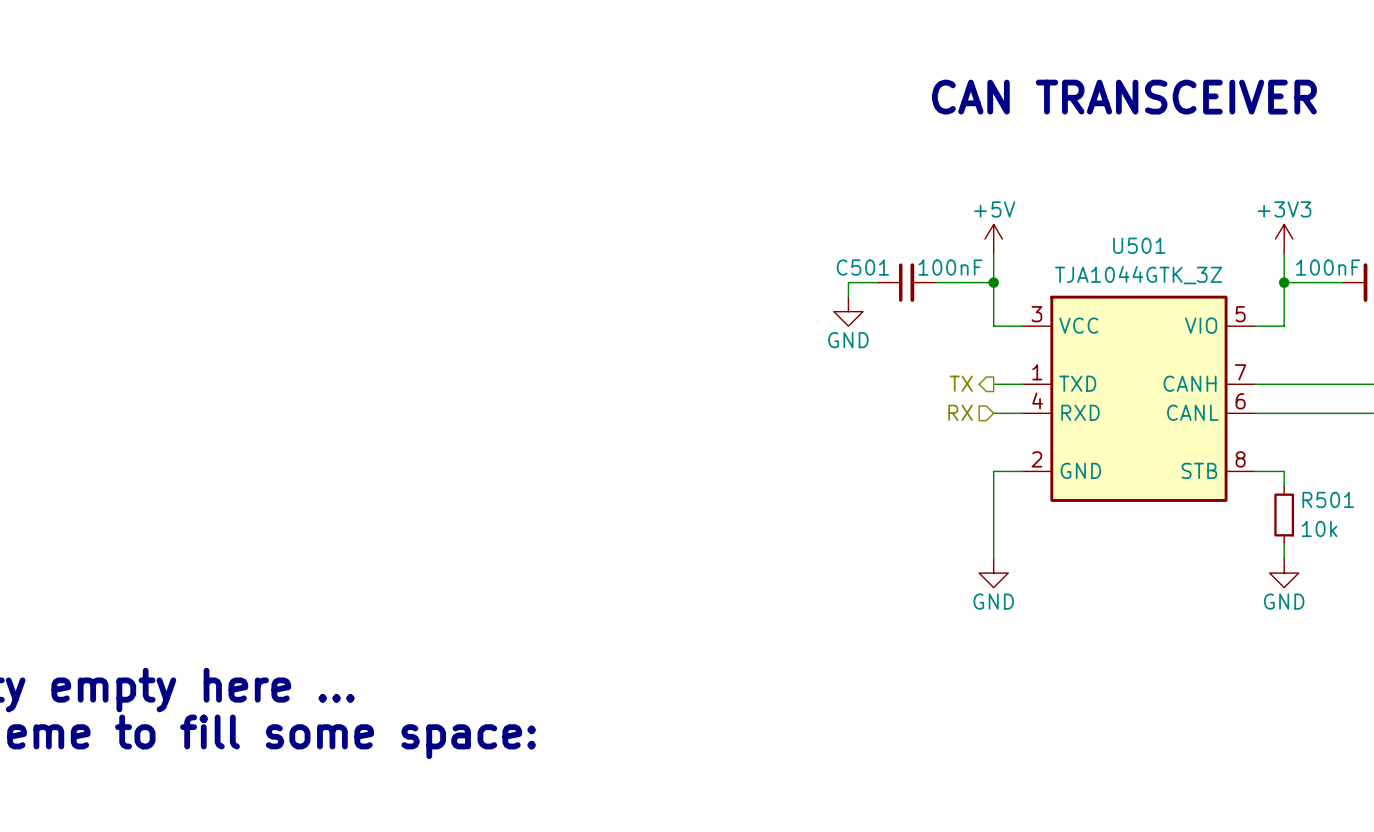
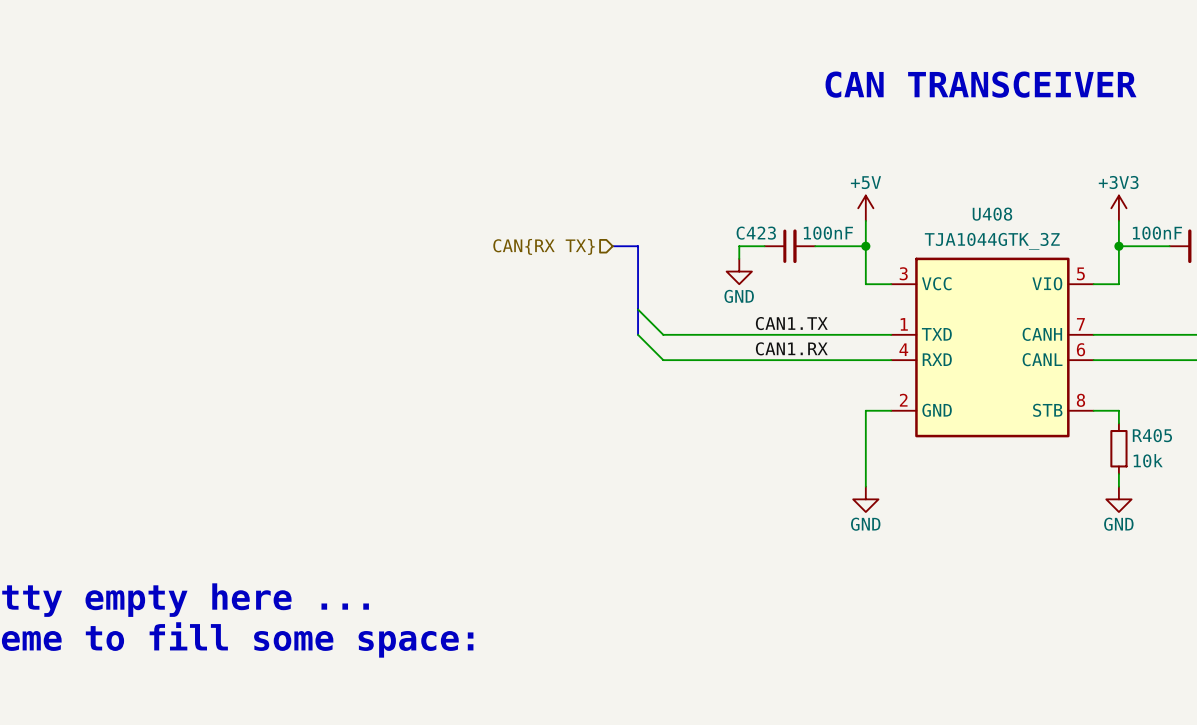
U501 name: U501 (1139, 245) -> U408 (992, 214)
C501 name: C501 (862, 267) -> C423 (756, 233)
bus: none -> (612, 246) (638, 246) (638, 334)
hierarchical label: none -> CAN{RX TX} (544, 246)
wire: none -> (638, 309) (663, 334) (865, 334)
label: none -> CAN1.TX (791, 323)
hierarchical label: TX (961, 383) -> none
wire: none -> (638, 334) (663, 360) (865, 360)
label: none -> CAN1.RX (791, 348)
hierarchical label: RX (960, 412) -> none
R501 name: R501 (1328, 499) -> R405 (1152, 435)

